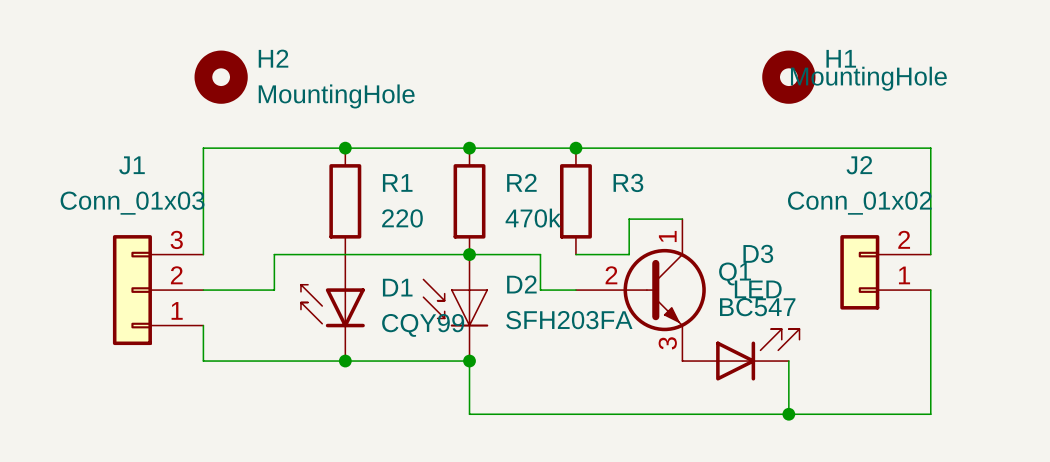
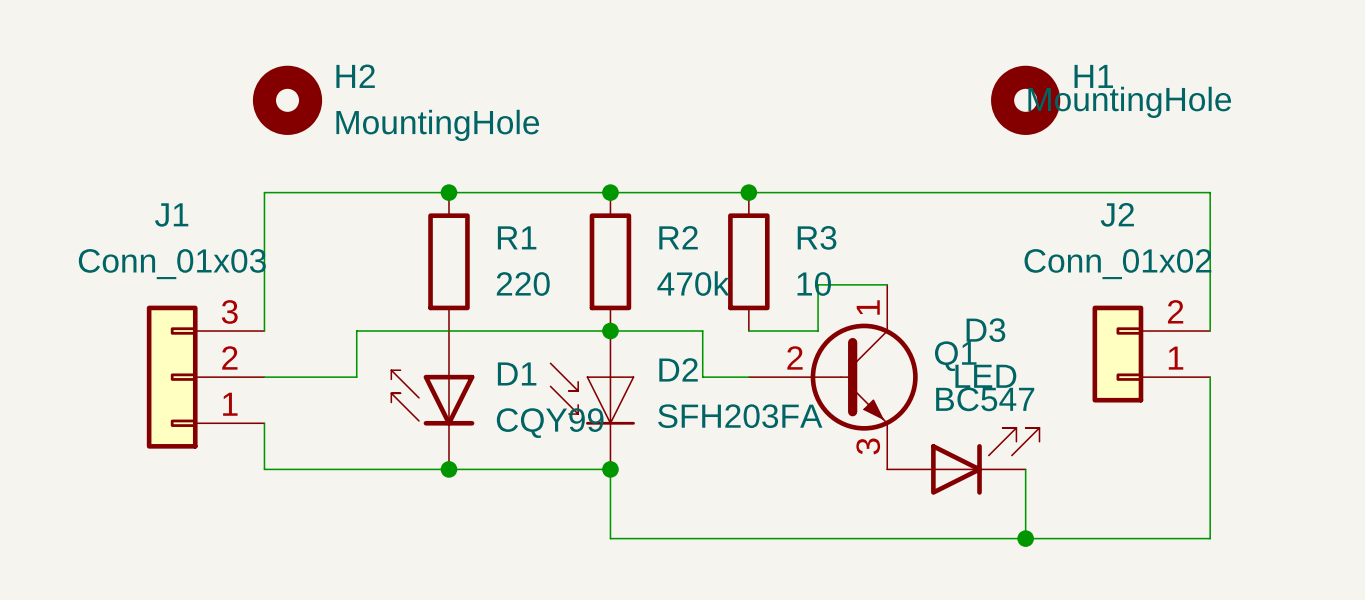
R3 value: none -> 10 (814, 284)

